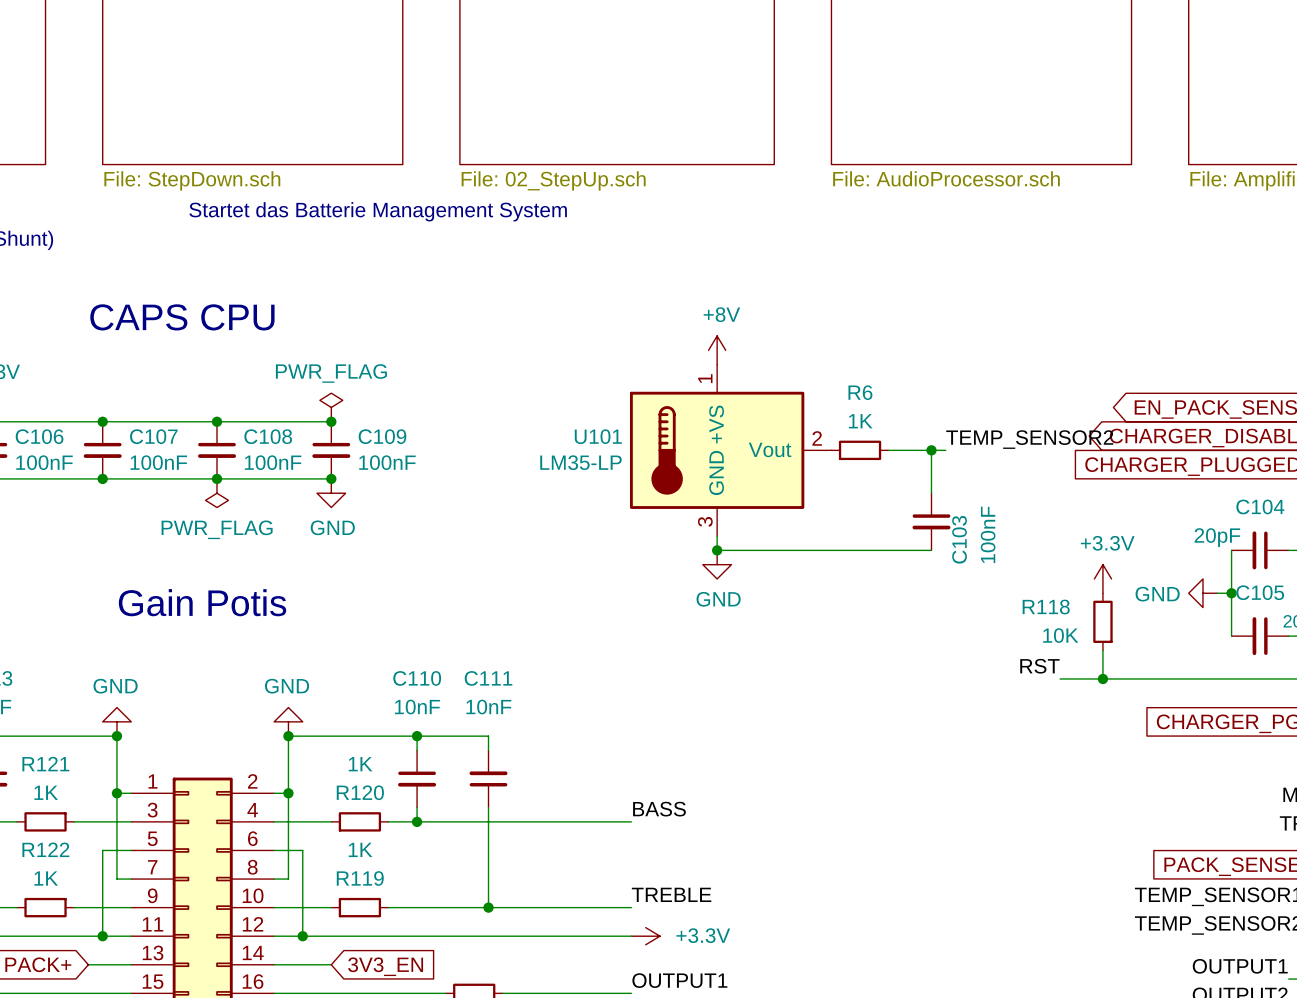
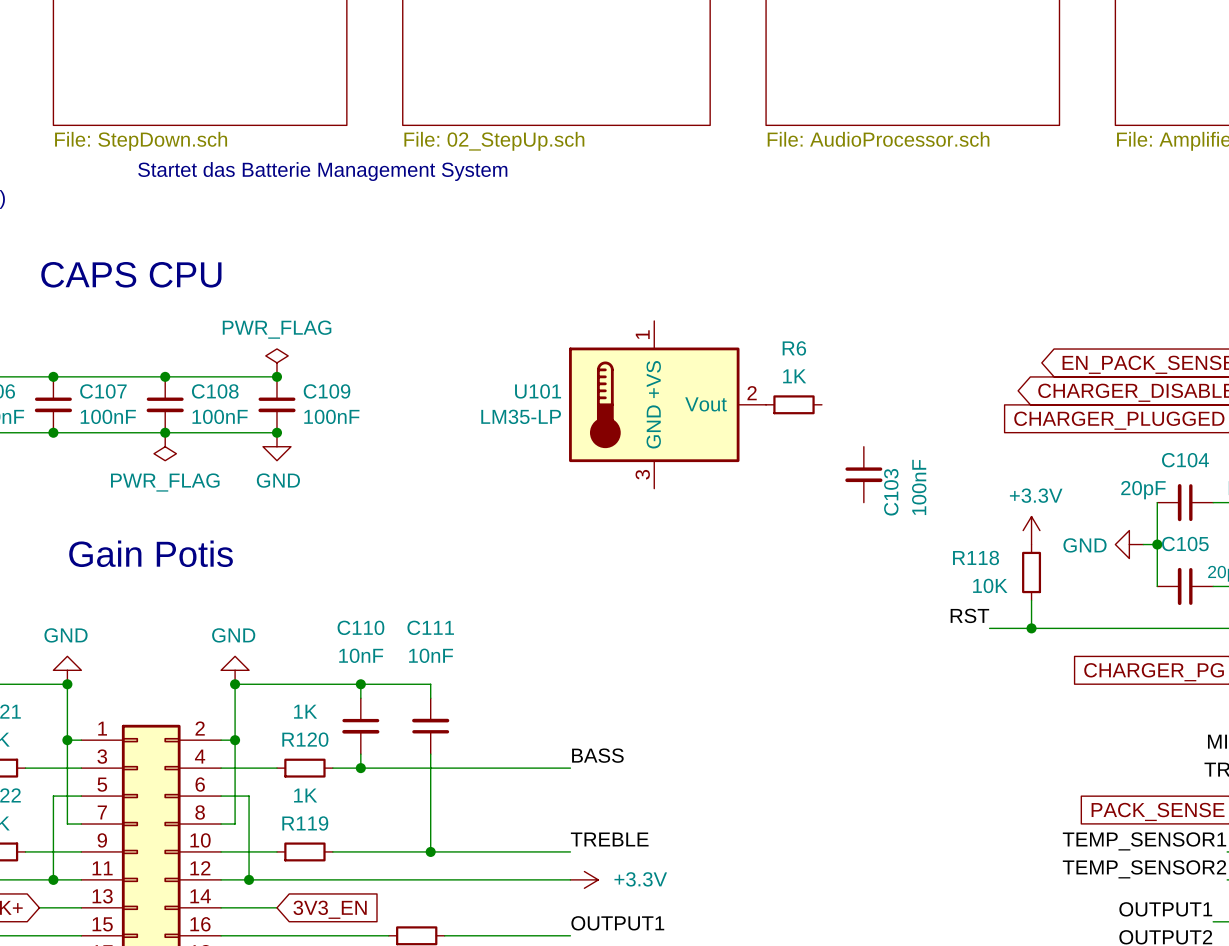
power symbol: +8V (717, 350) -> none
label: TEMP_SENSOR2 (1029, 439) -> none
wire: (888, 450) (945, 450) -> none
wire: (931, 450) (931, 493) -> none
junction: (931, 450) -> none
wire: (717, 536) (717, 550) (931, 550) -> none
junction: (717, 550) -> none
power symbol: GND (717, 564) -> none

